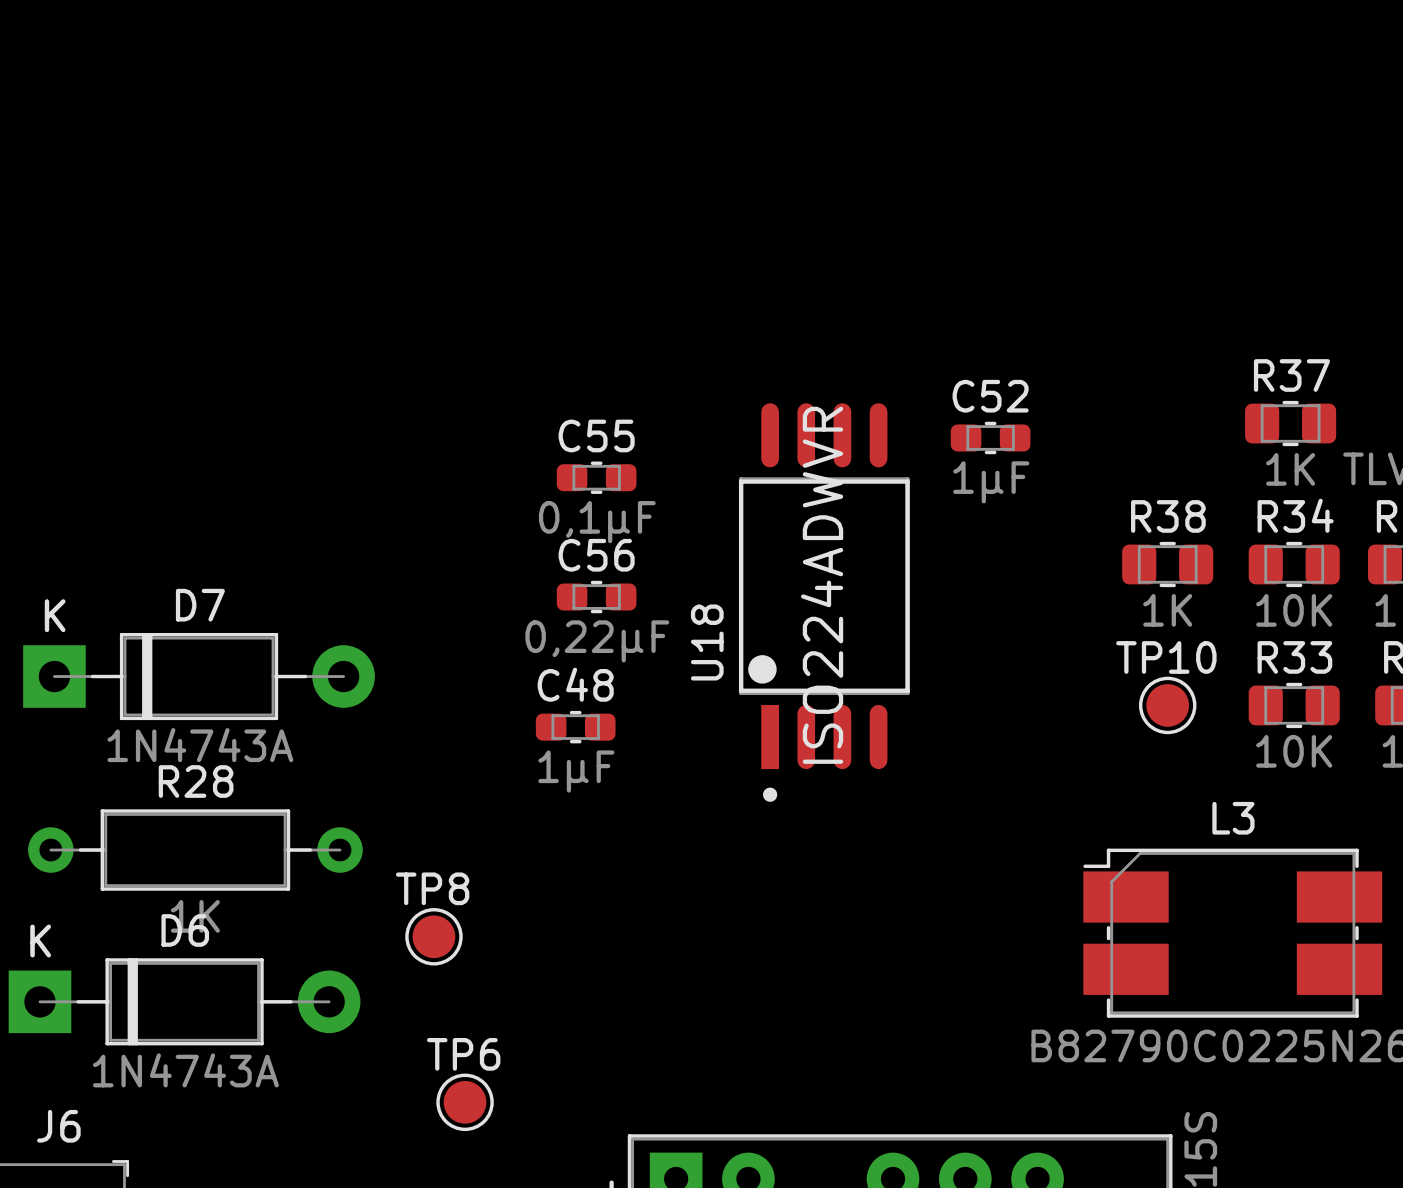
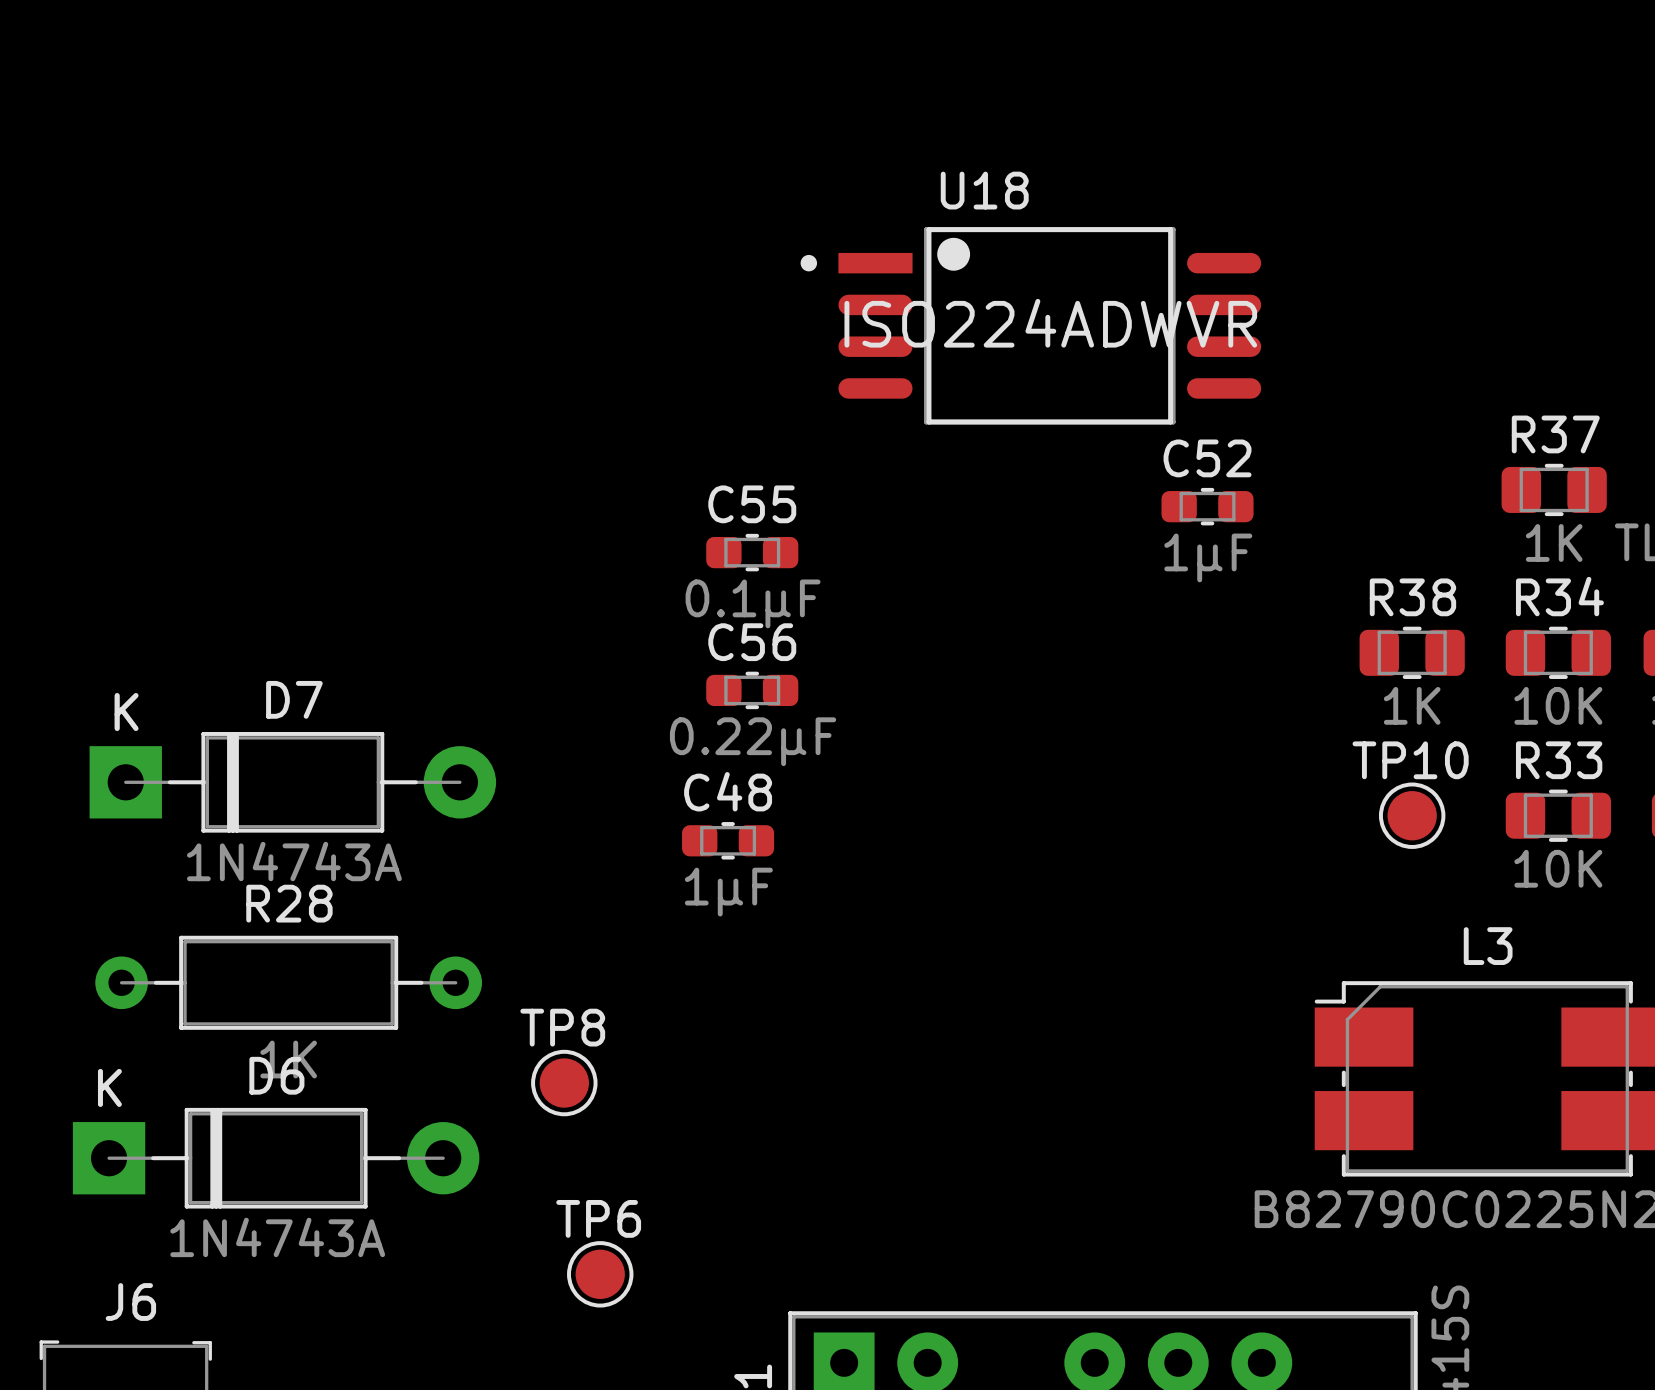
C55 value: 0,1µF (597, 522) -> 0.1µF (753, 603)
U18 rotation: 0° (824, 602) -> 90° clockwise (1030, 325)
U18 position: (824, 602) -> (1030, 325)
C56 value: 0,22µF (597, 641) -> 0.22µF (753, 741)

